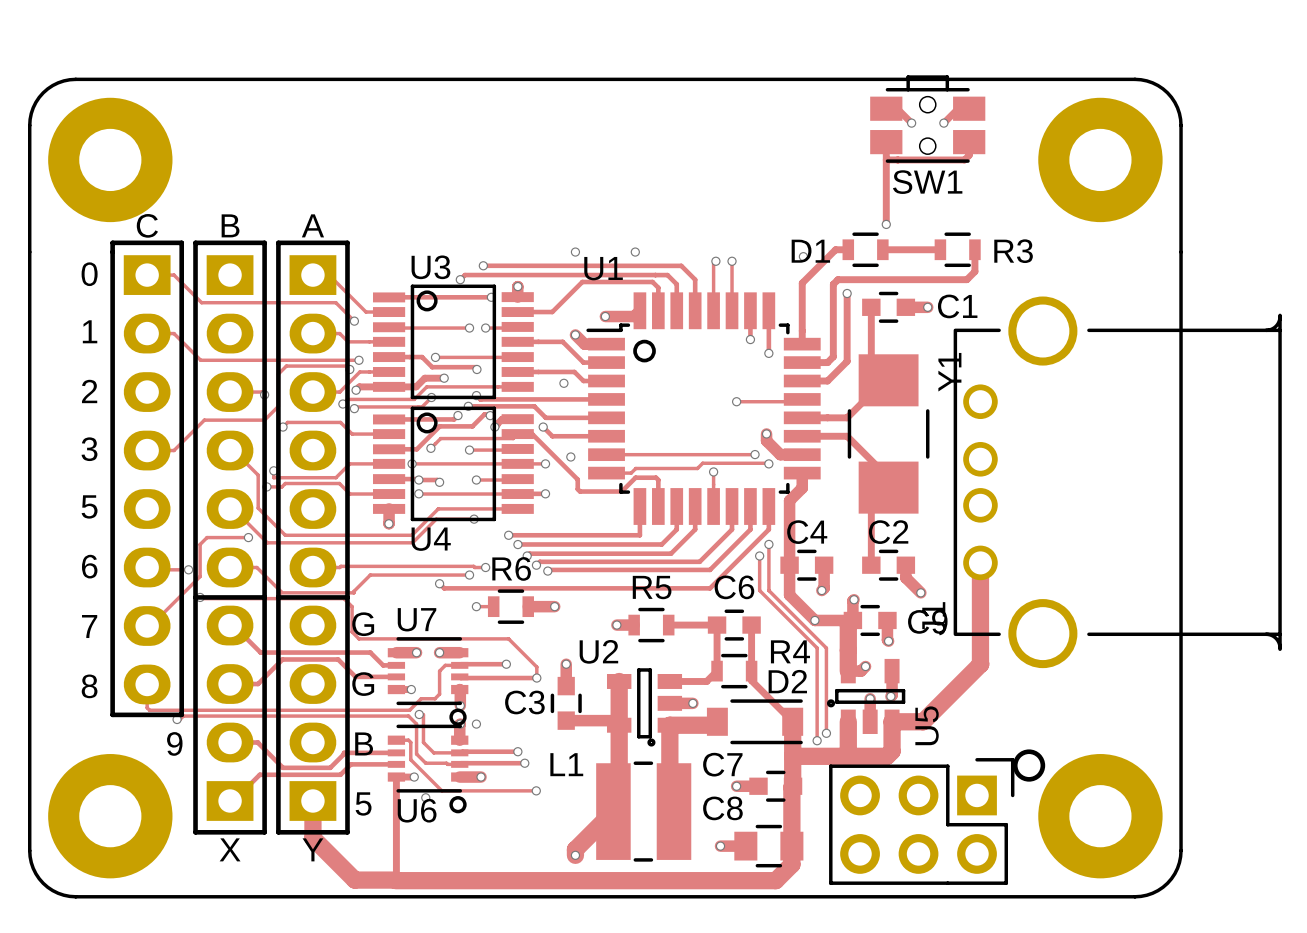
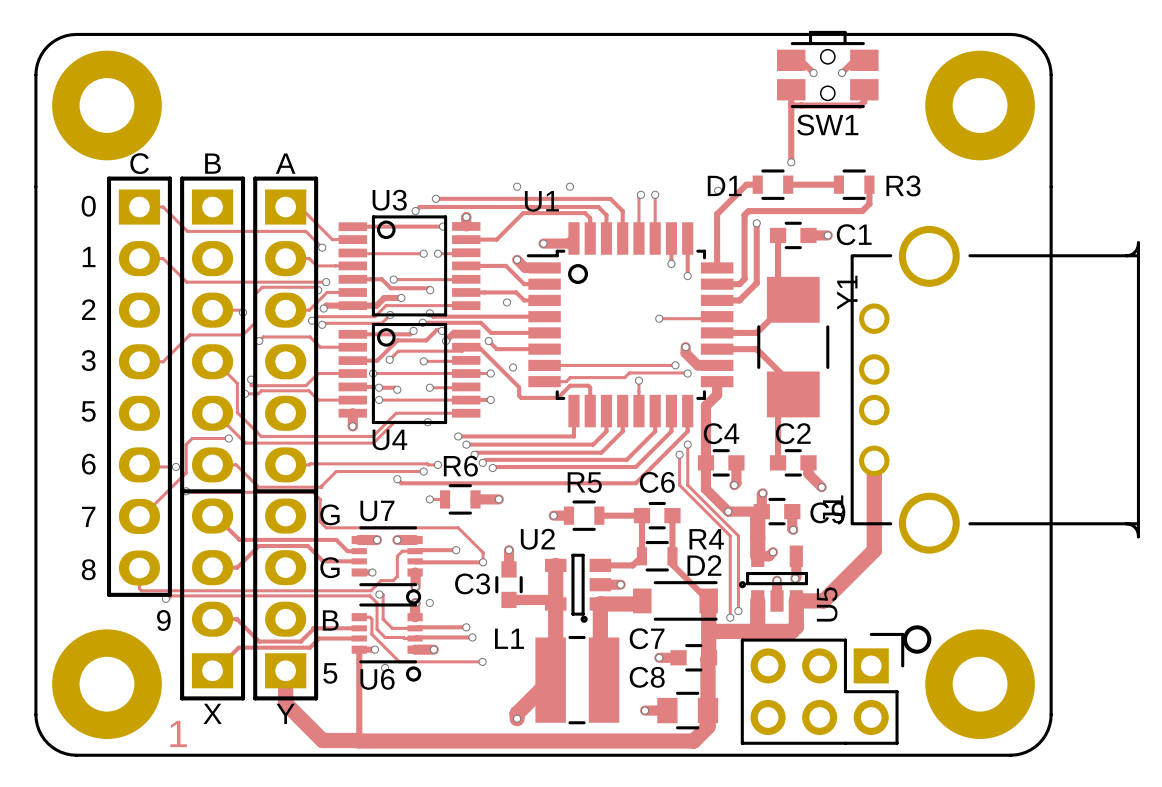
text: none -> 1 (178, 733)

